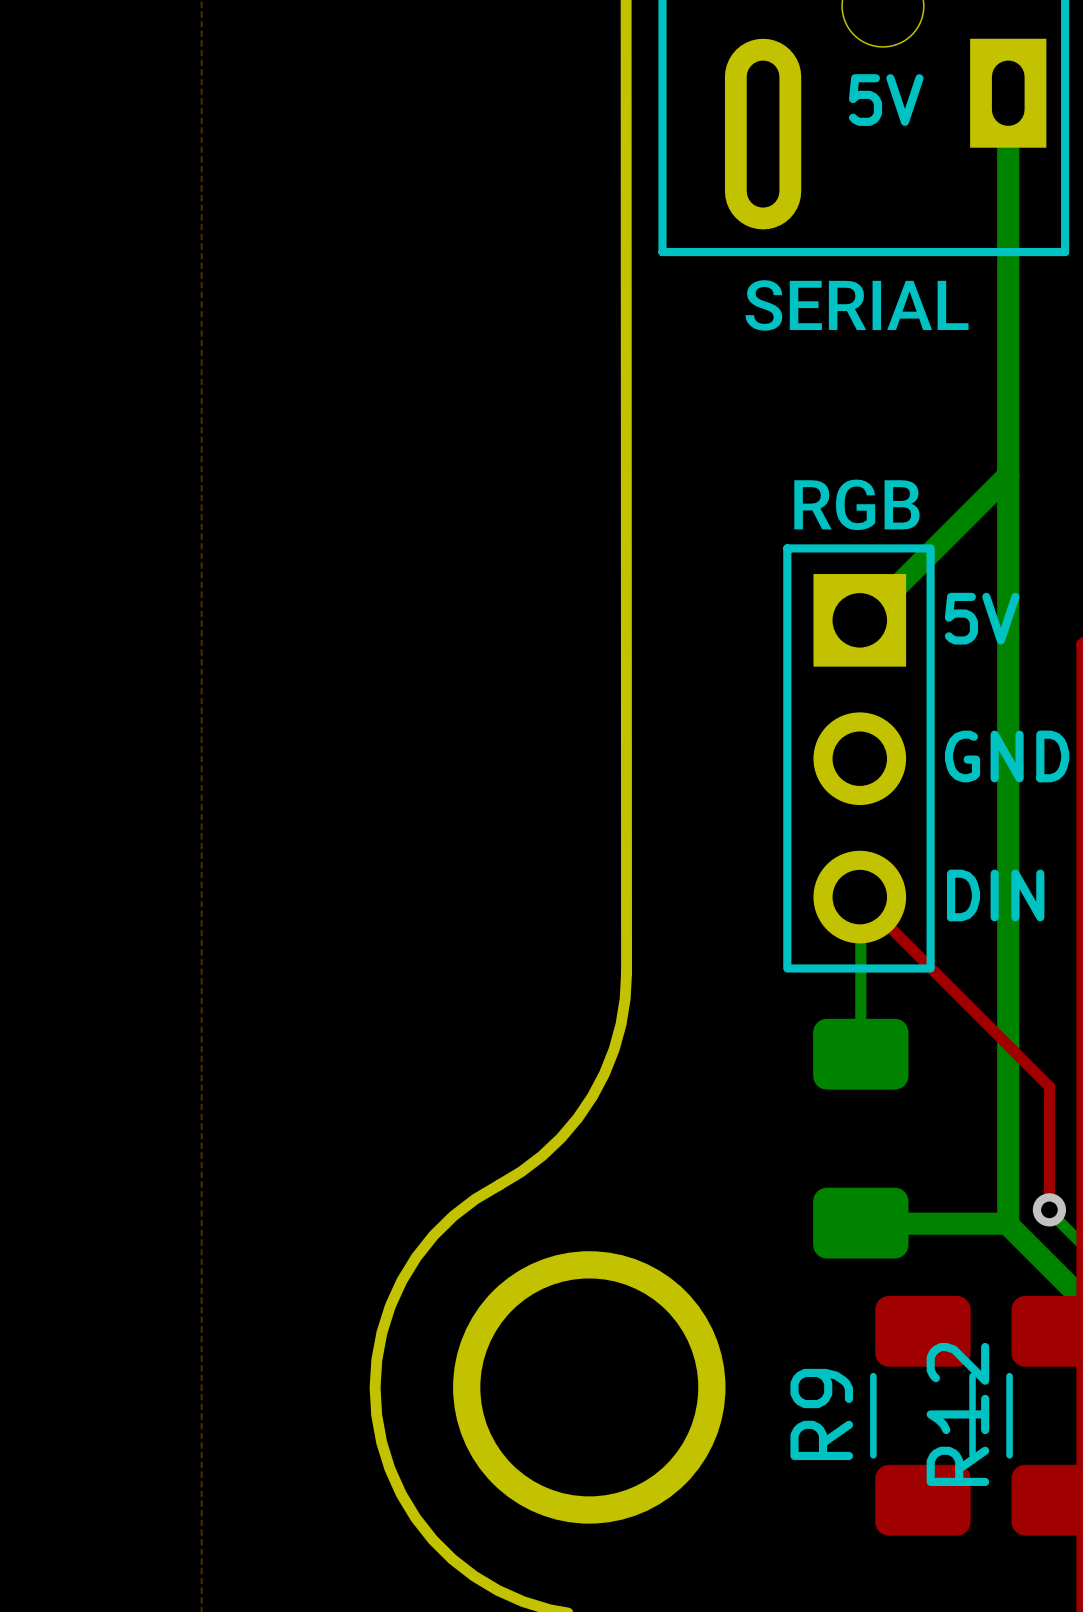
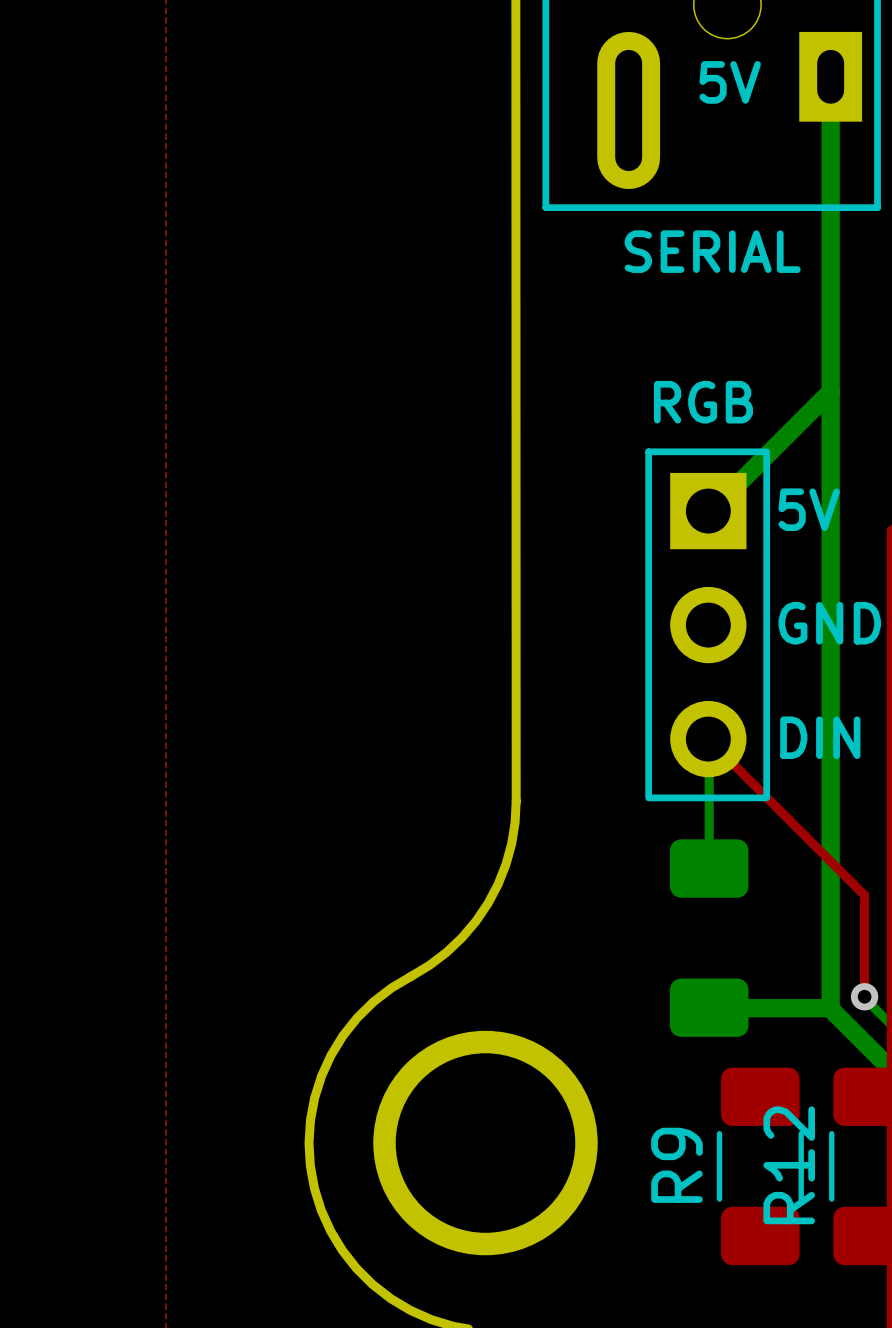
drawing: [745, 280, 969, 331] -> none
text: none -> SERIAL (712, 251)
drawing: [794, 479, 920, 531] -> none
text: none -> RGB (703, 402)

